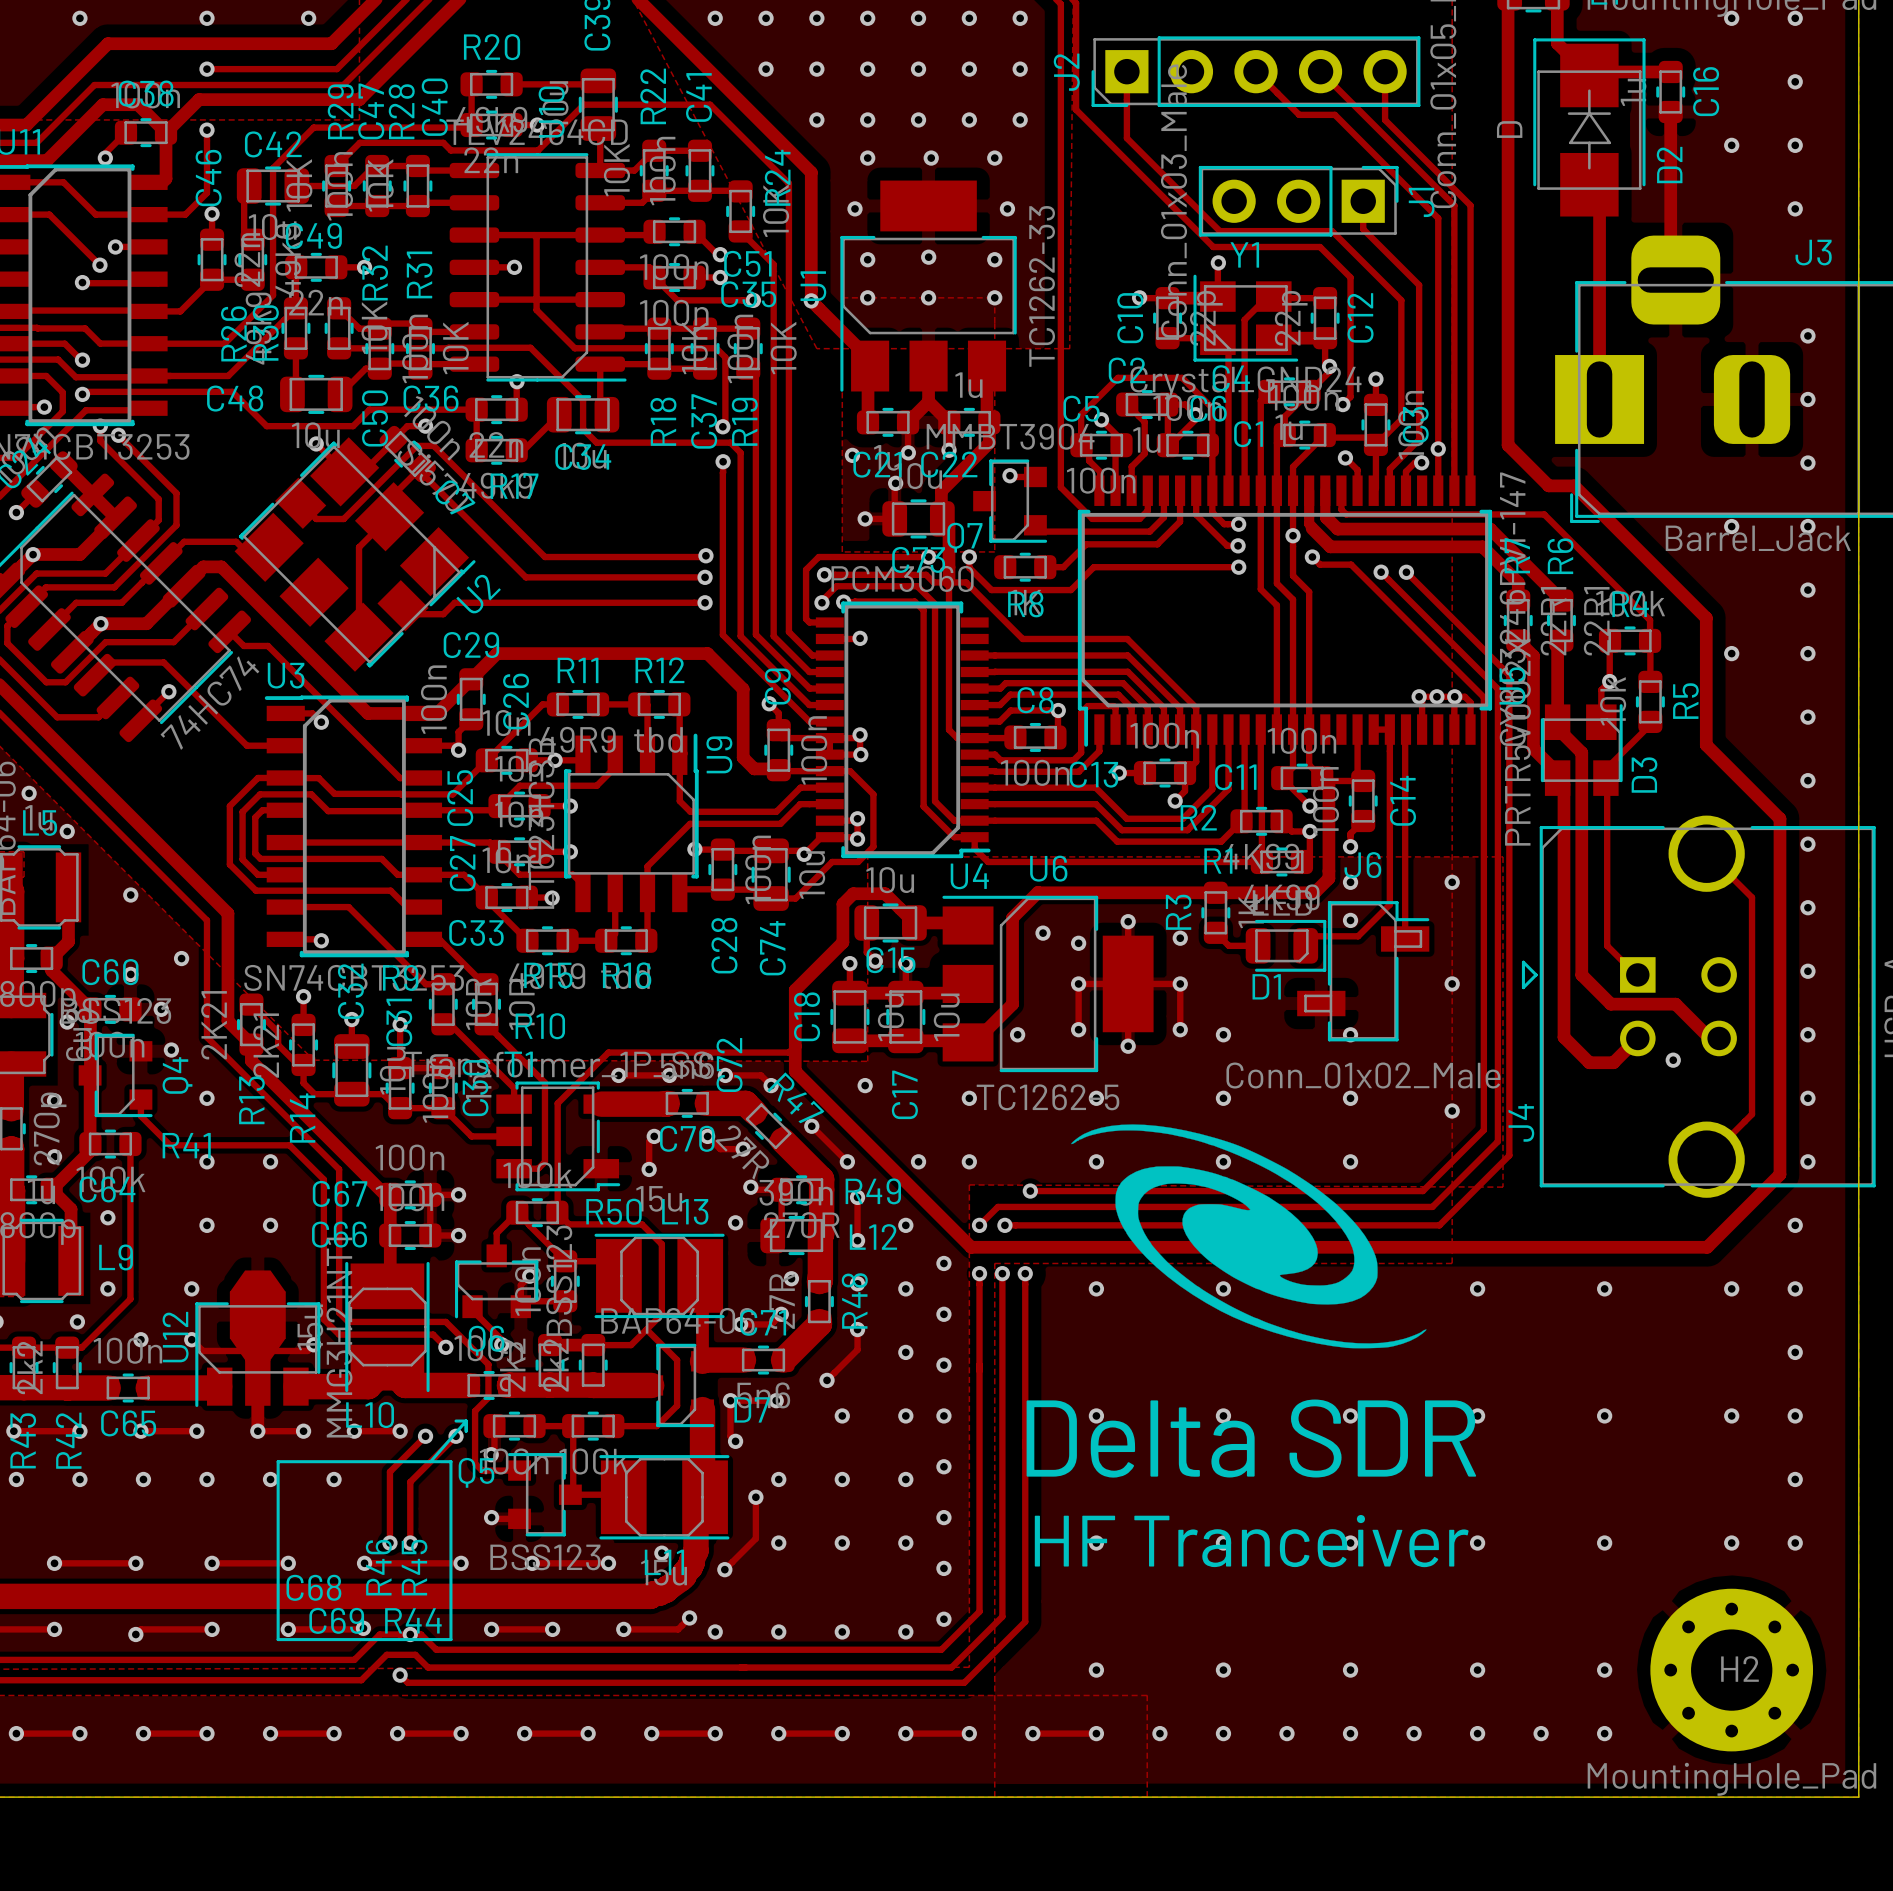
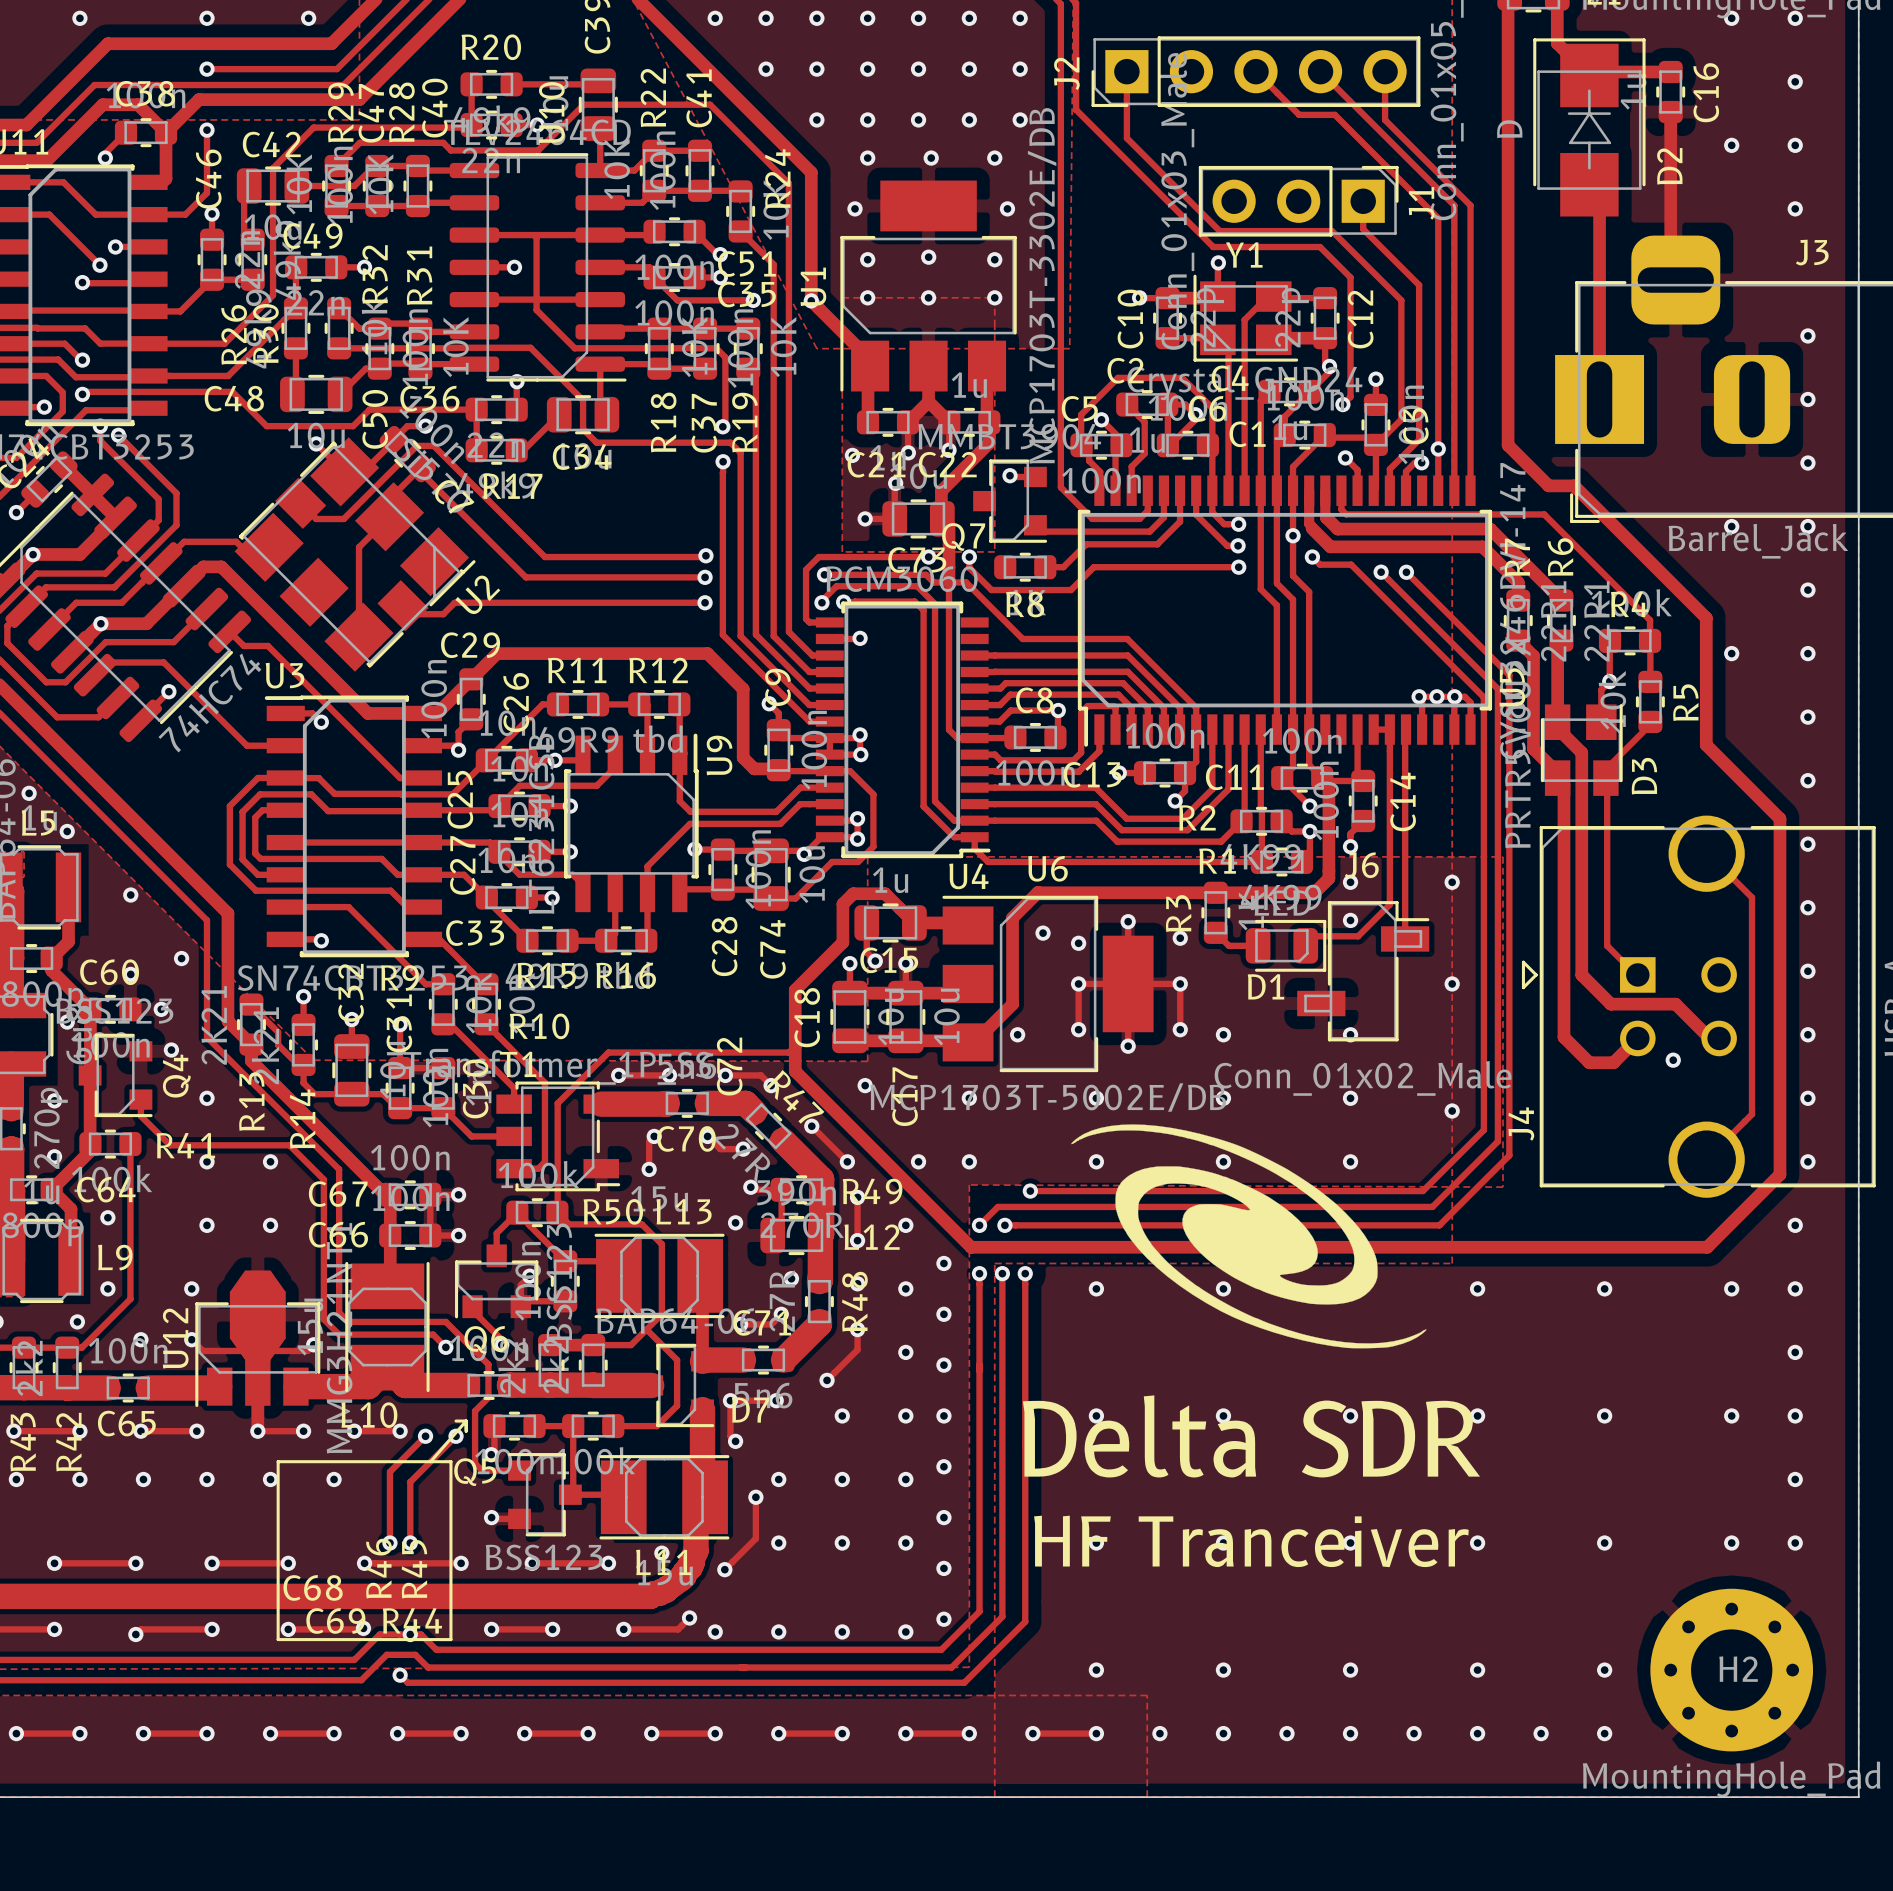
U1 value: TC1262-33 (1041, 286) -> MCP1703T-3302E/DB (1042, 285)
C15 value: 10u (890, 880) -> 1u (890, 880)
U6 value: TC1262-5 (1048, 1097) -> MCP1703T-5002E/DB (1048, 1097)

